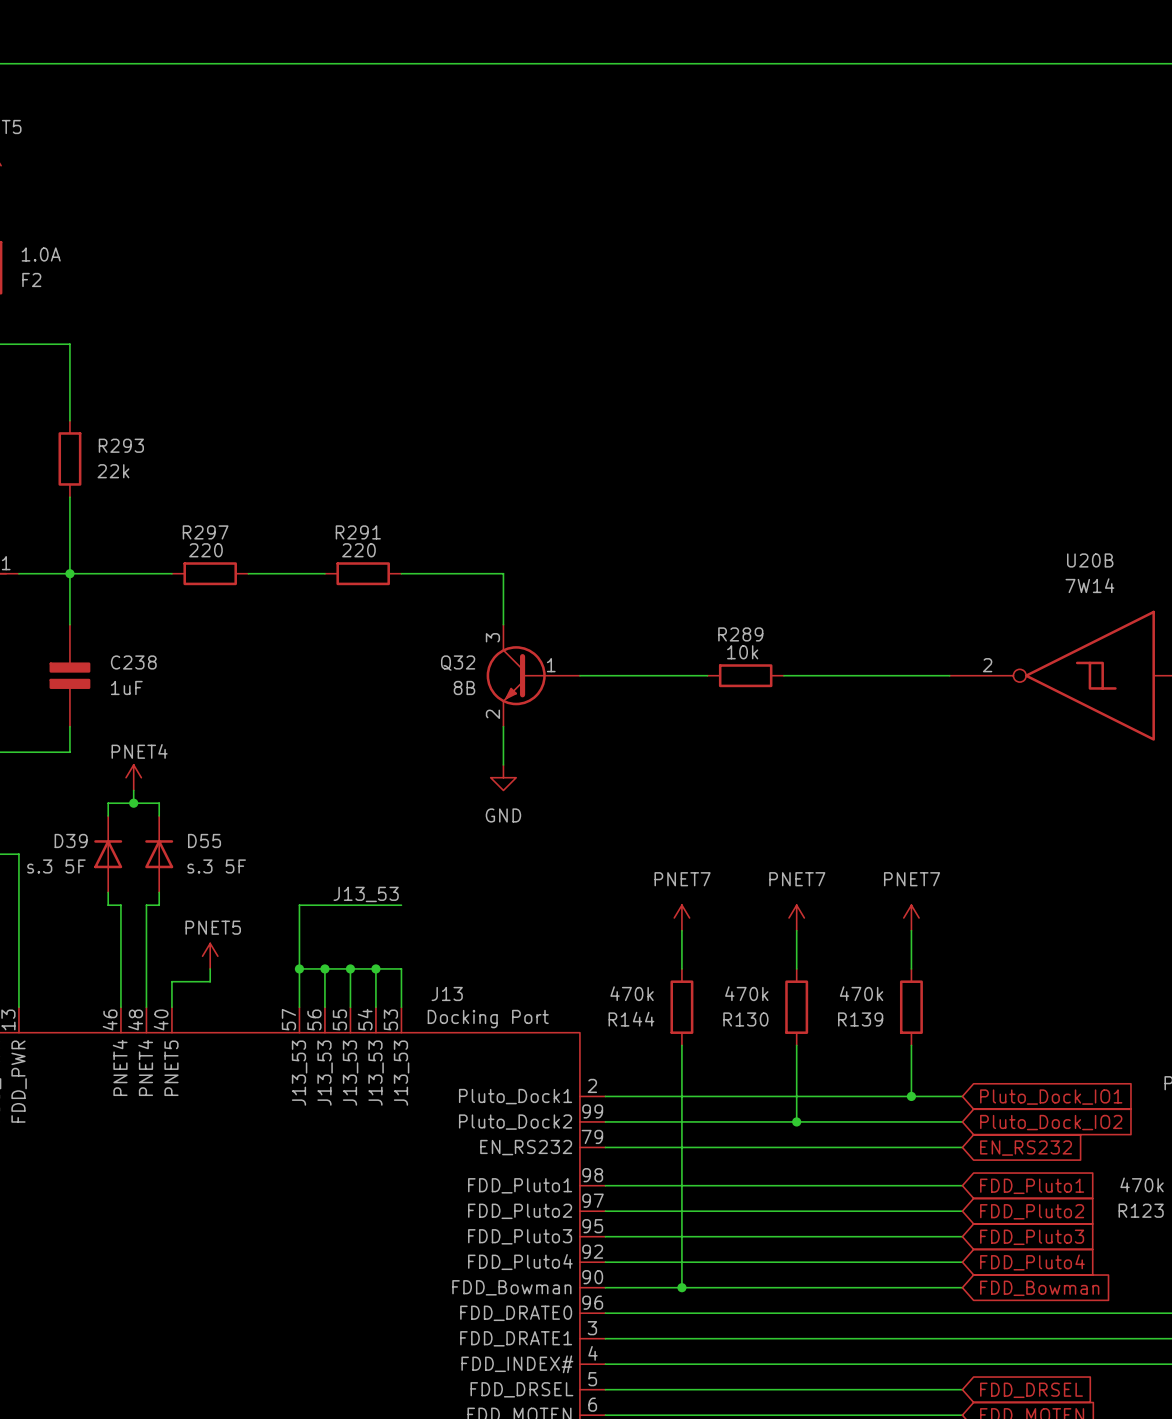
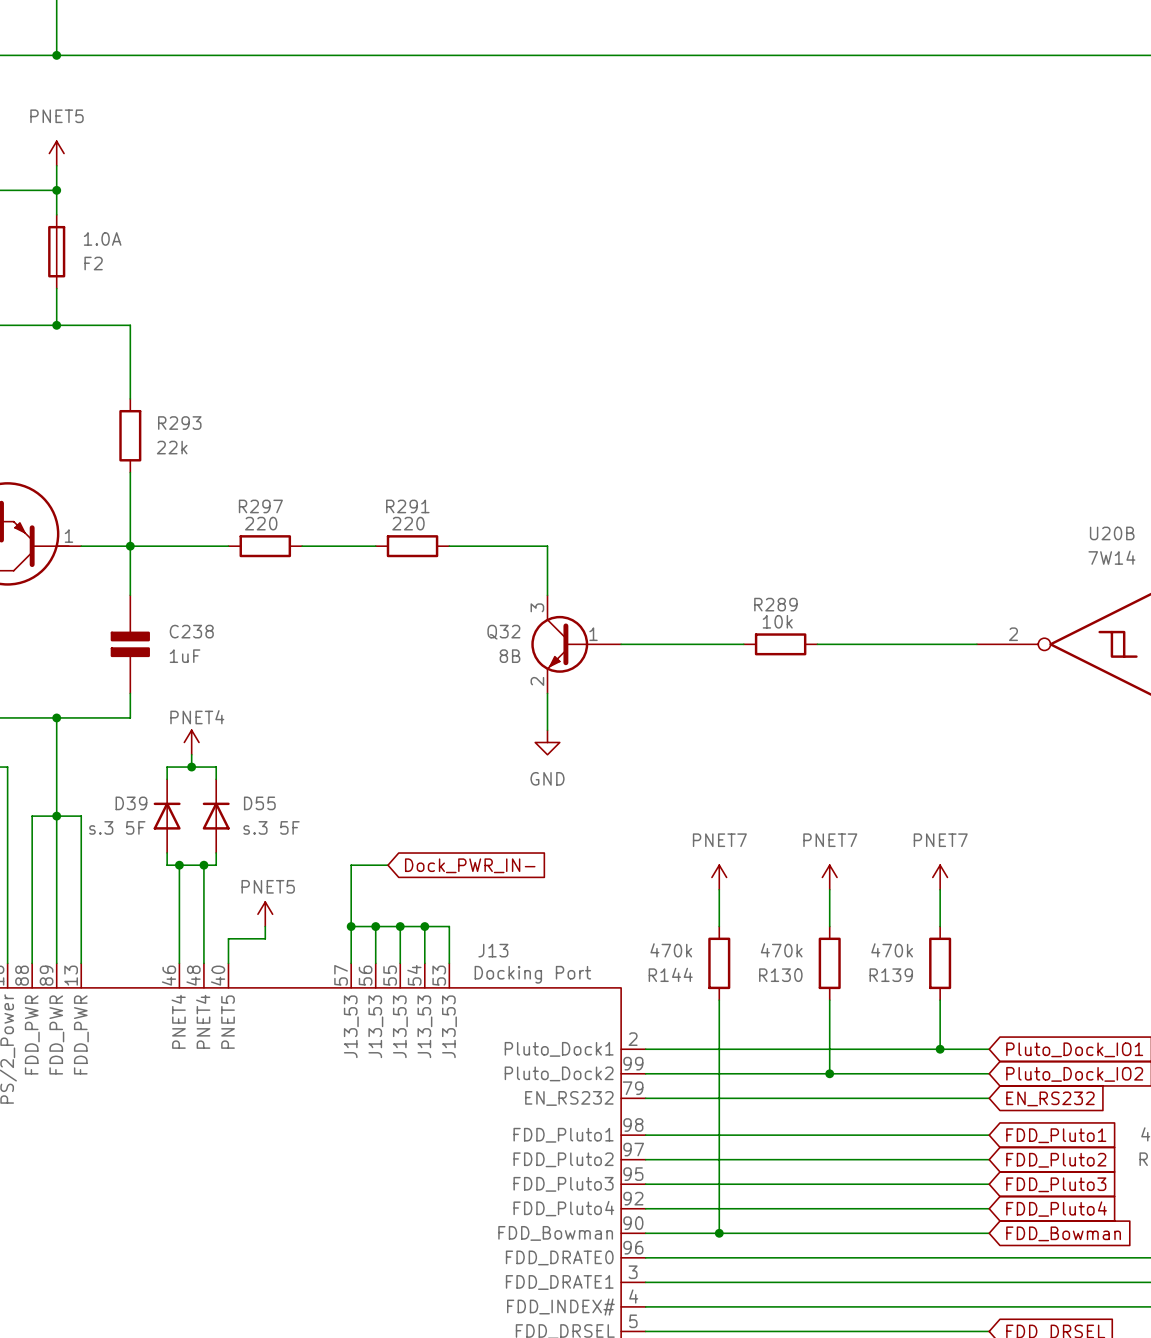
label: J13_53 (366, 894) -> none
wire: none -> (179, 865) (203, 865)
junction: none -> (179, 865)
junction: none -> (203, 865)
wire: (337, 905) (401, 905) -> none
global label: none -> Dock_PWR_IN- (470, 865)

